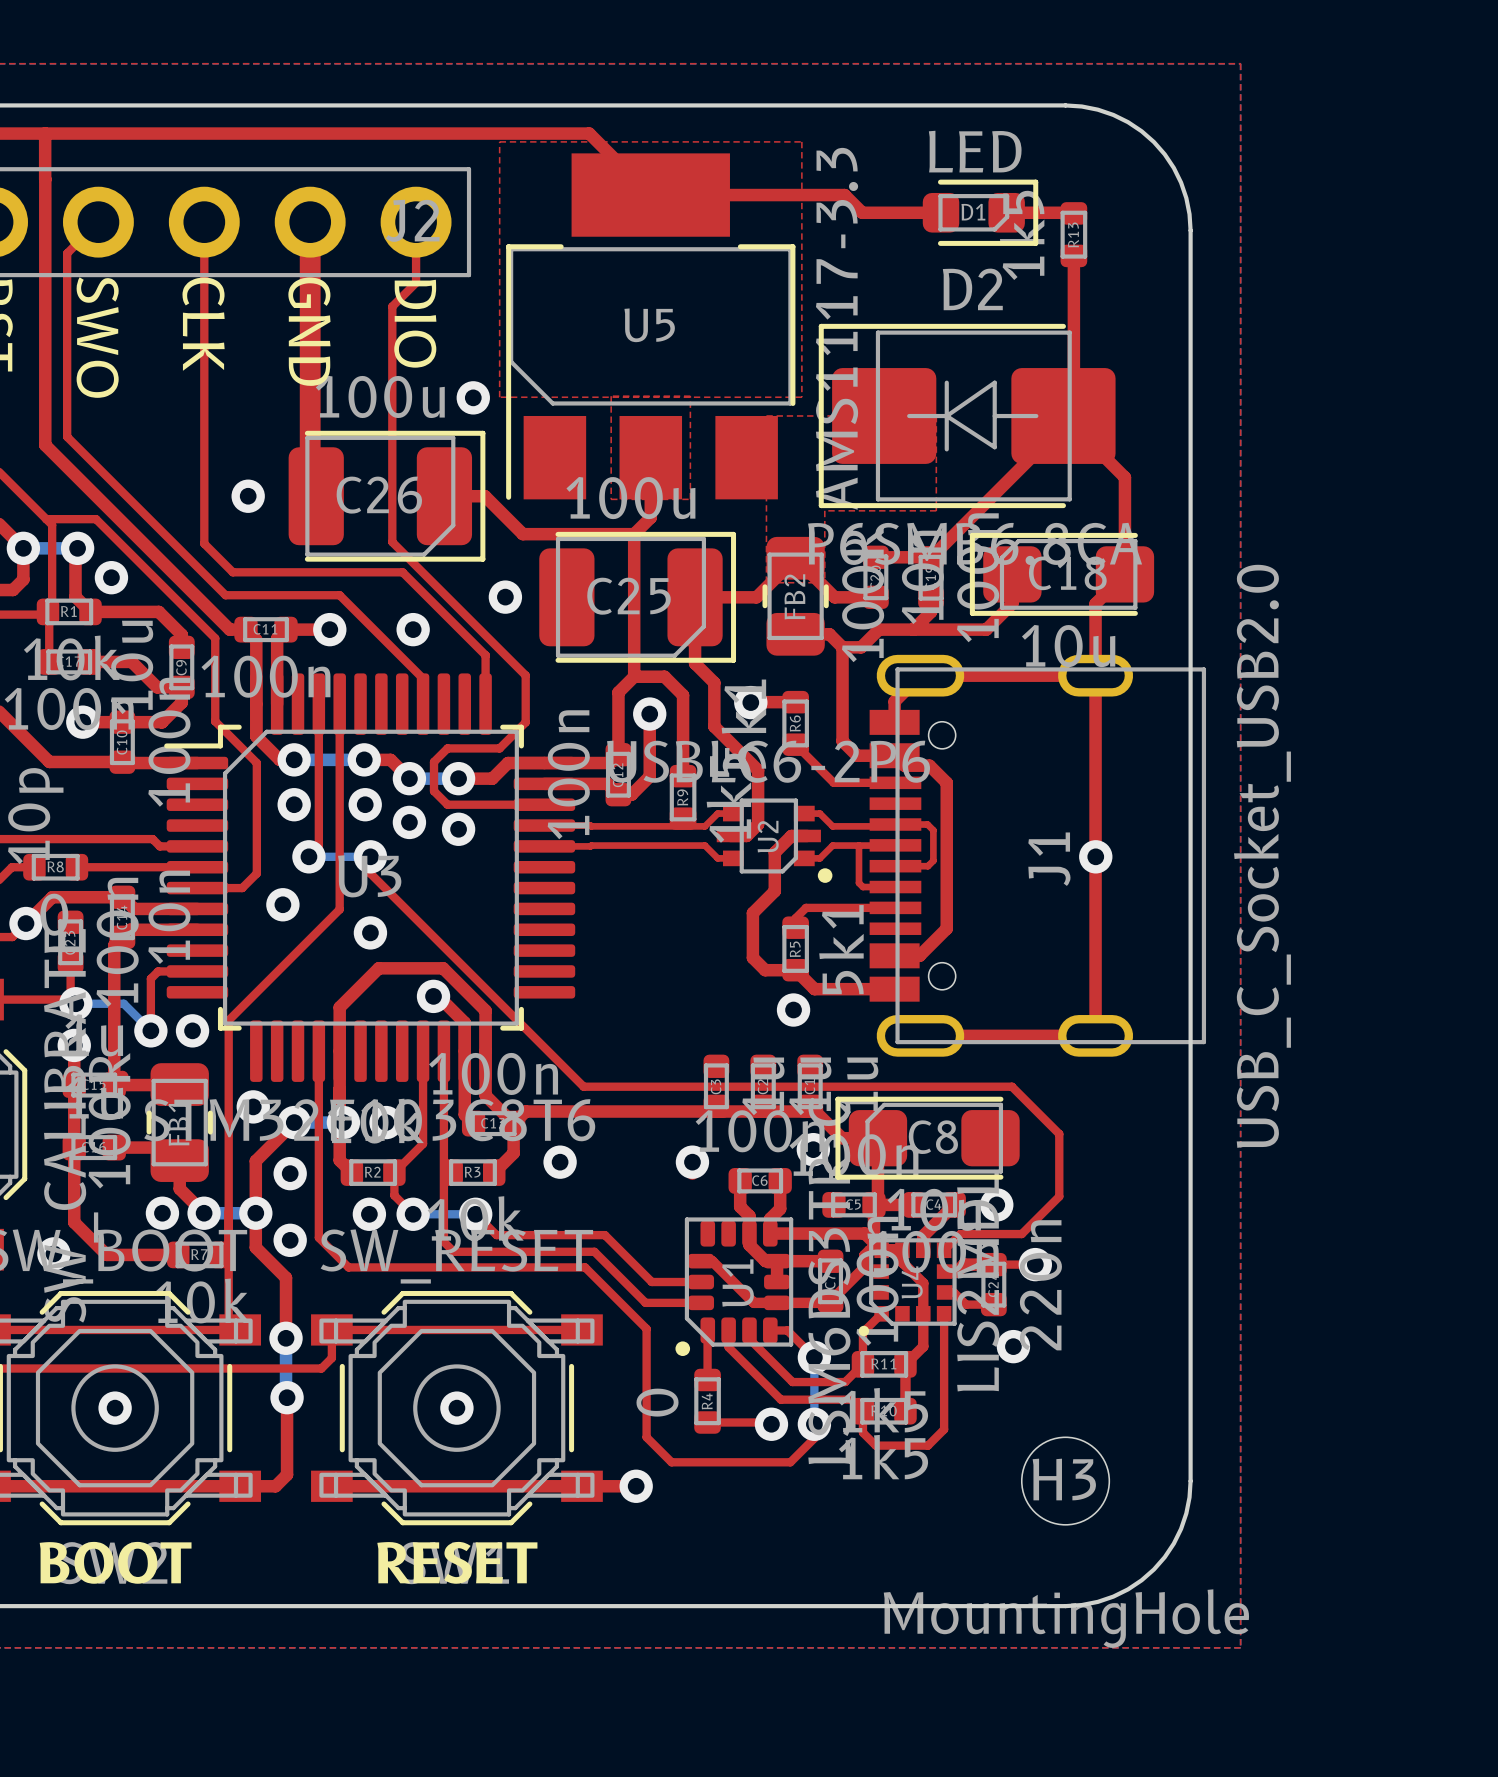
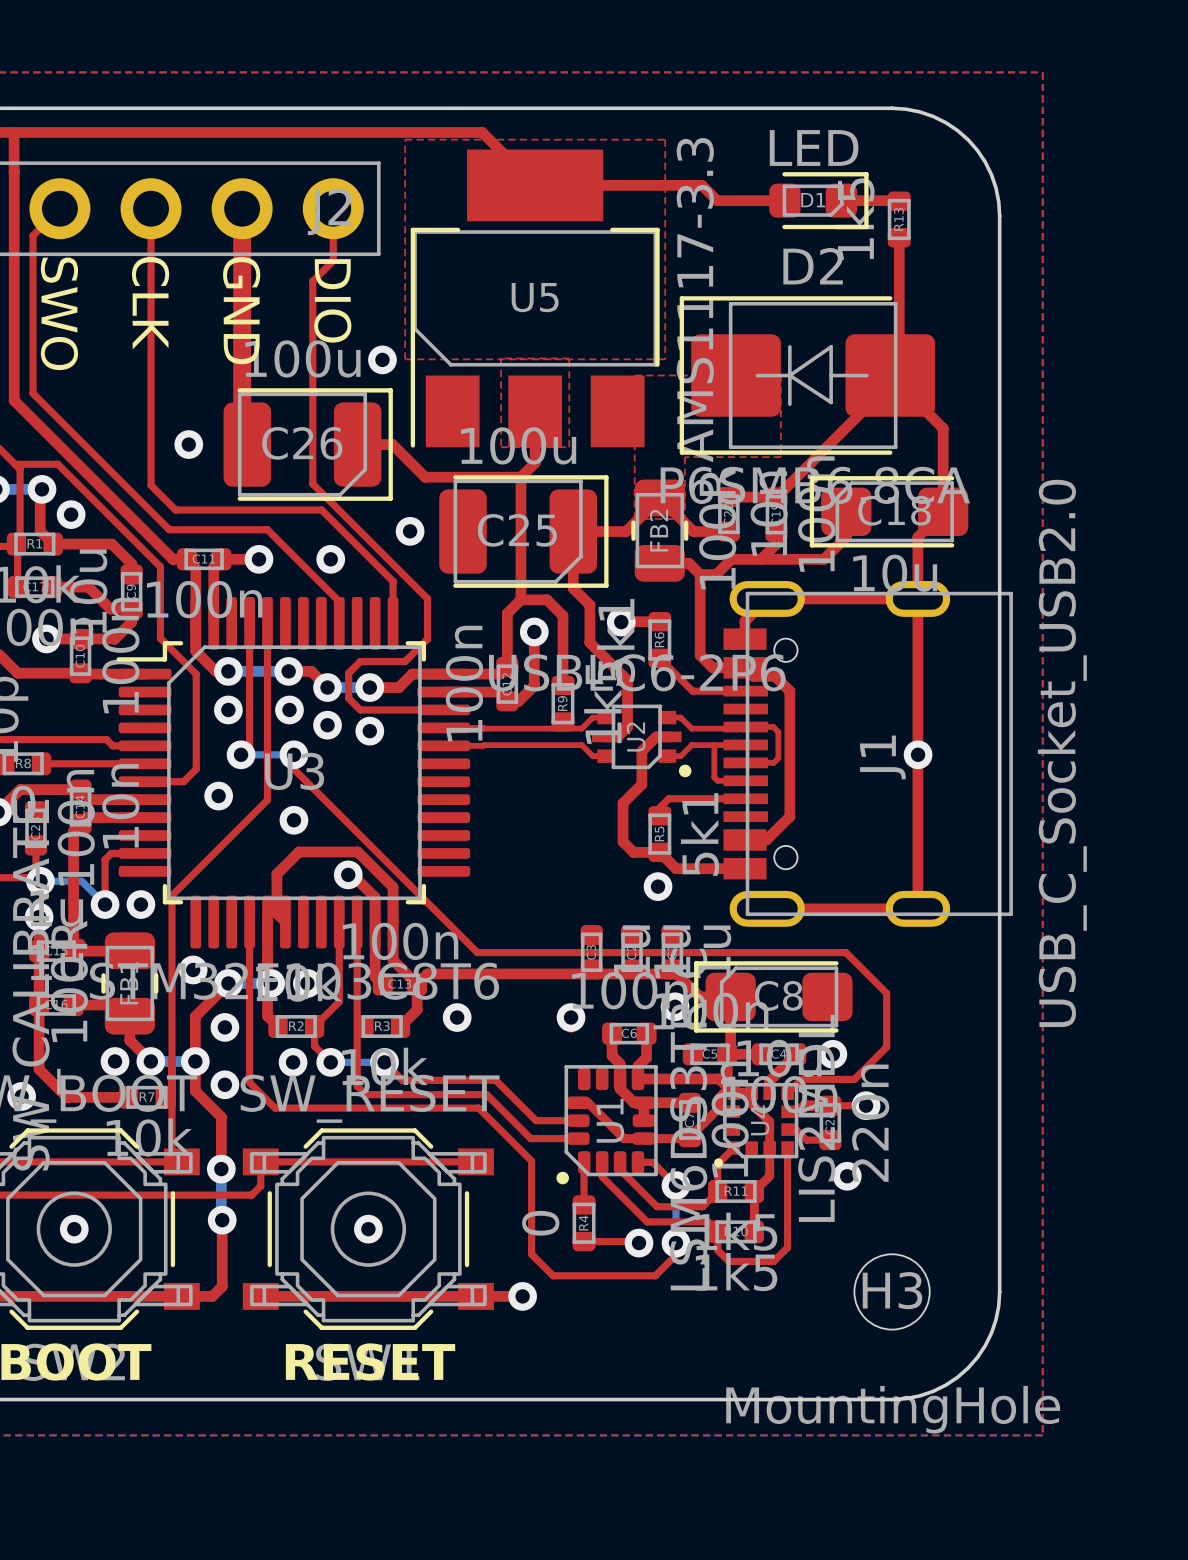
top track: (444, 969) (378, 968) (339, 1007) (339, 1051) -> (357, 851) (299, 851) (276, 874) (276, 913) (285, 922)

